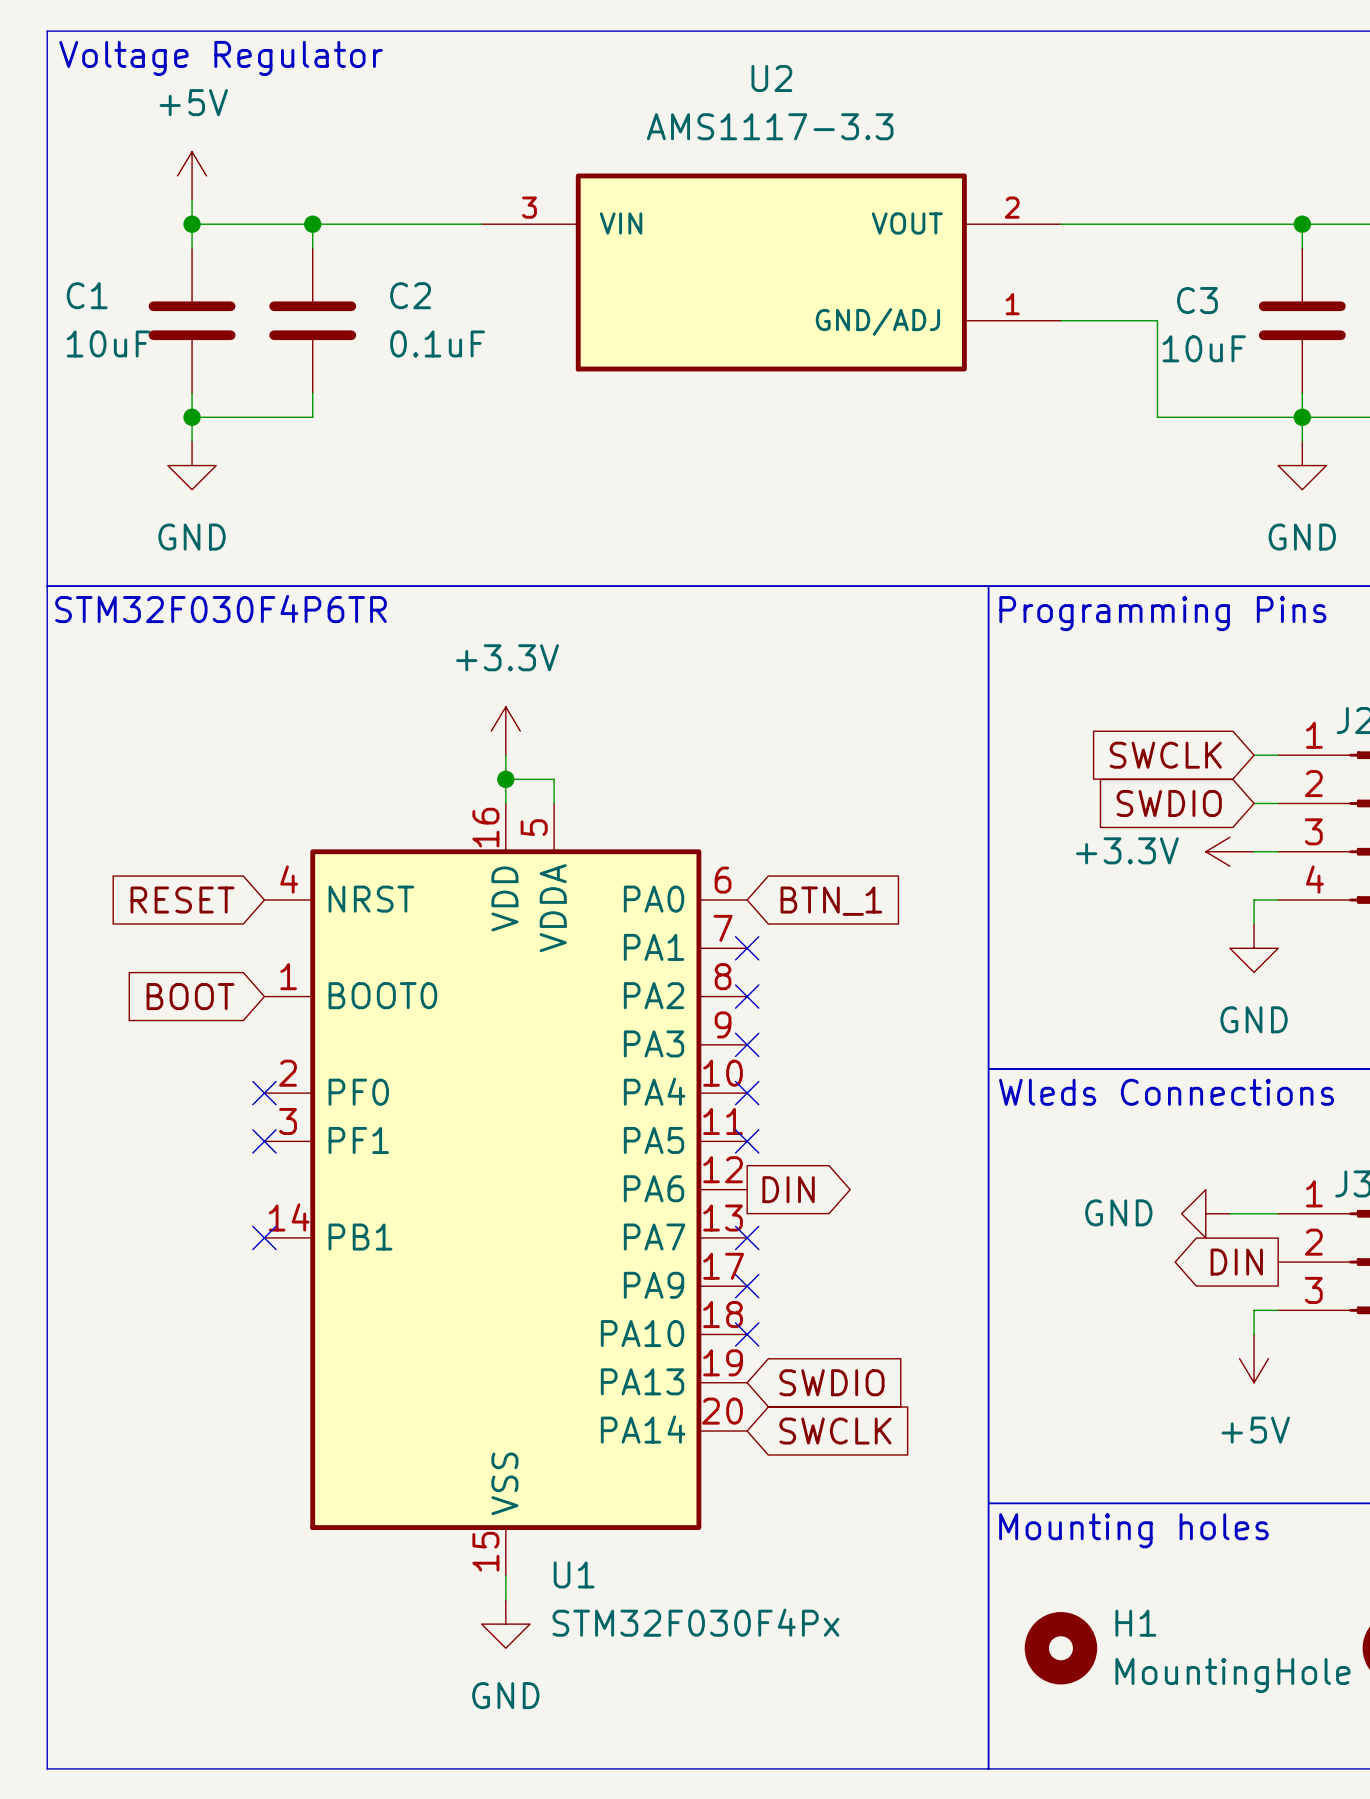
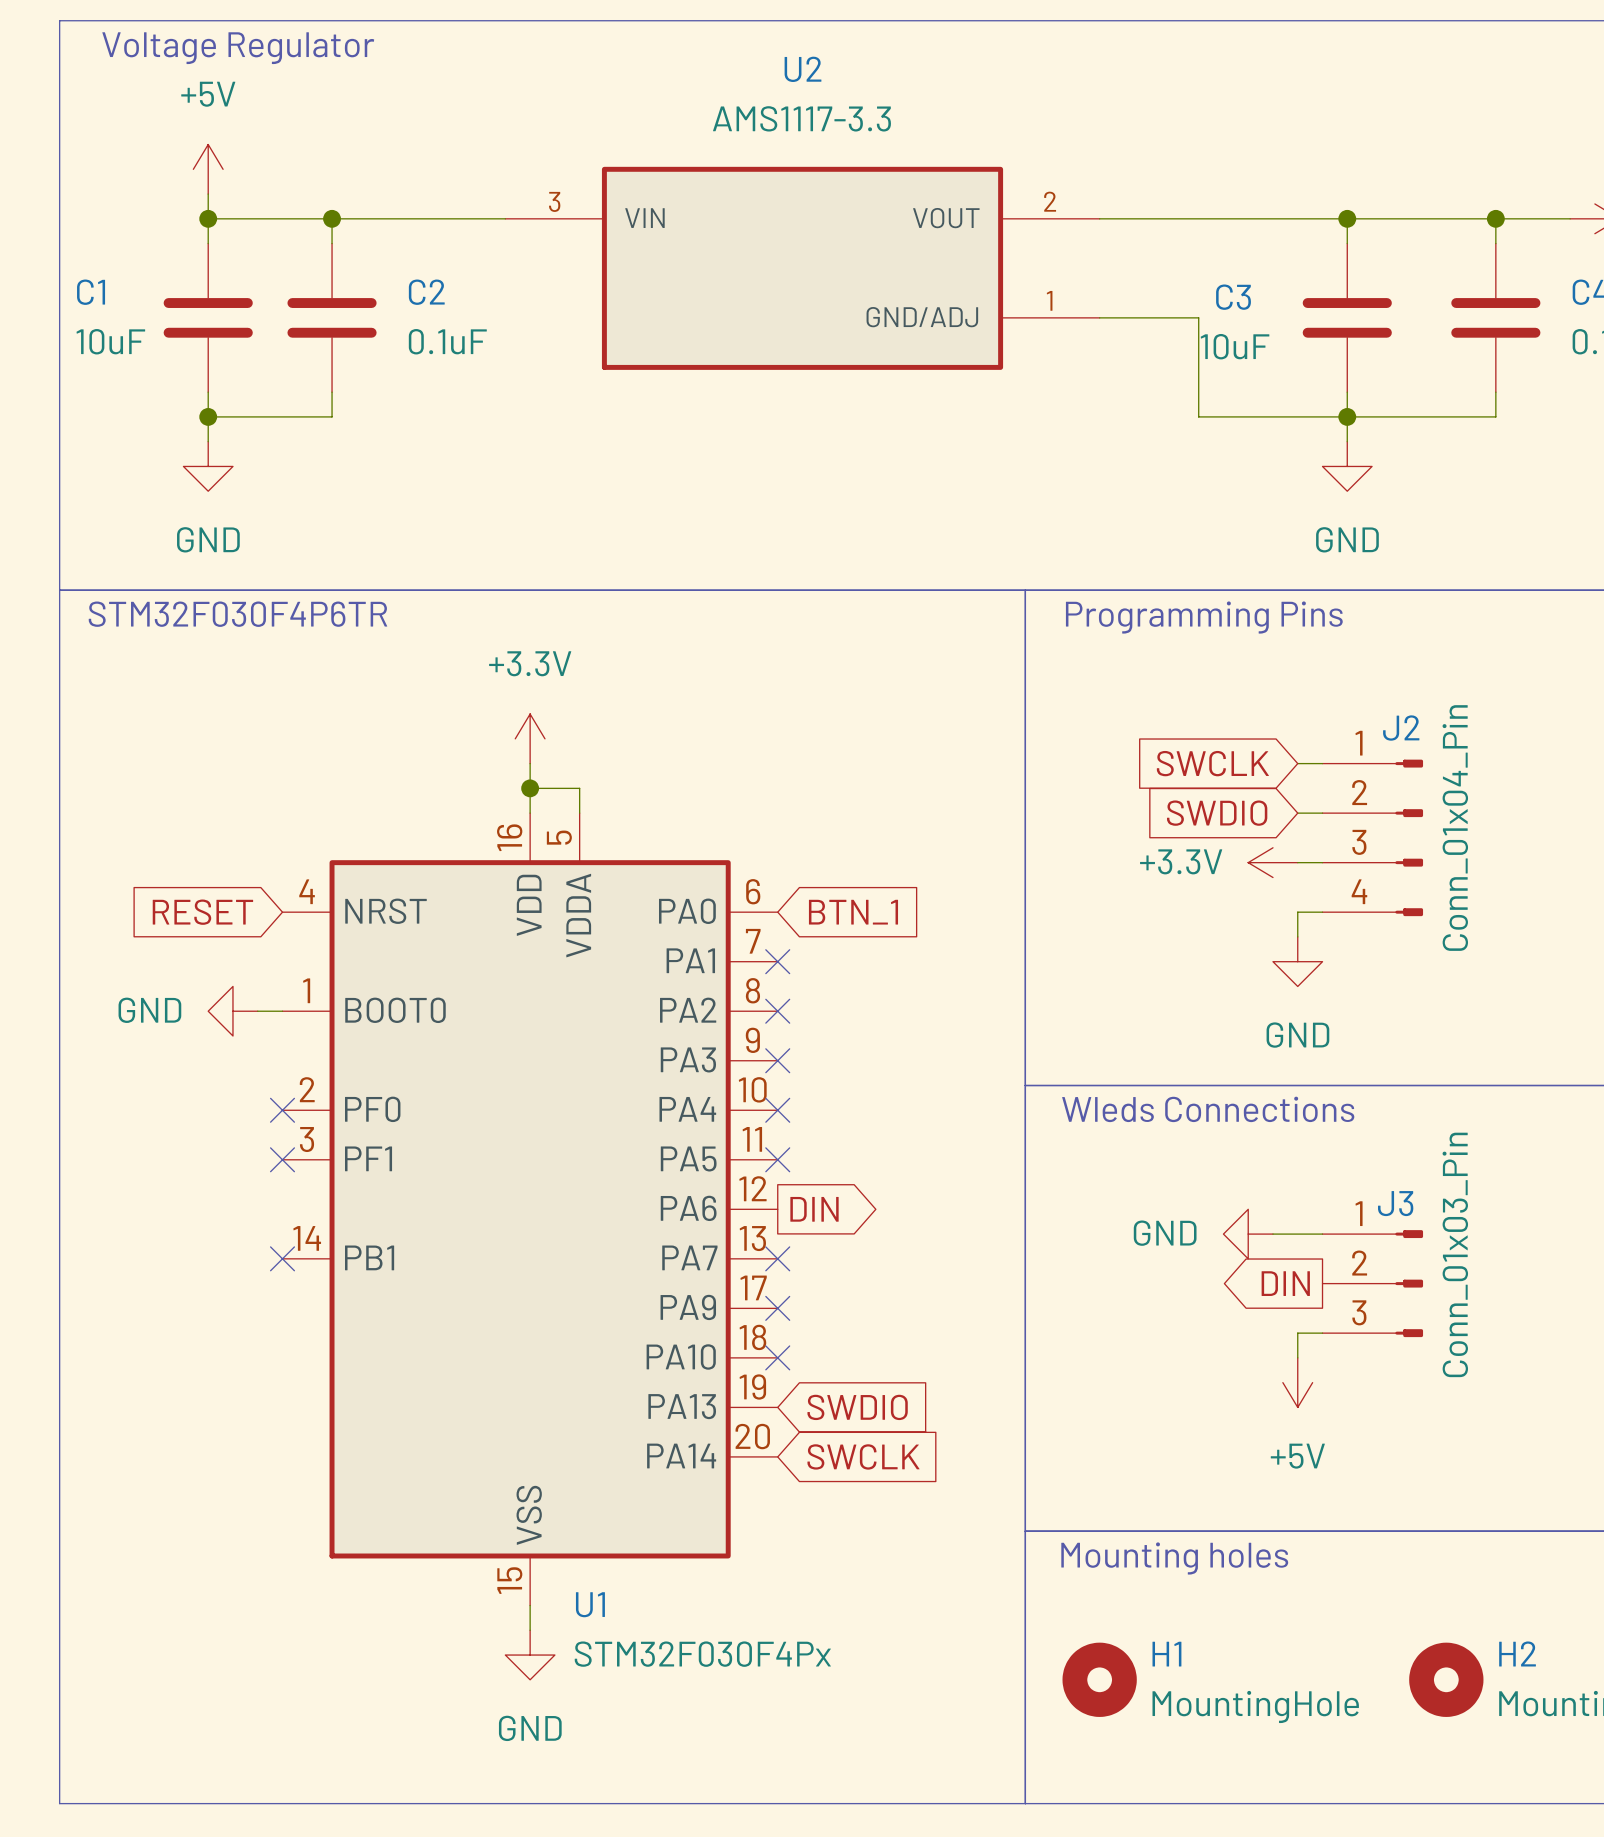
global label: BOOT (190, 996) -> none
power symbol: none -> GND (232, 1011)
wire: none -> (257, 1011) (282, 1011)

